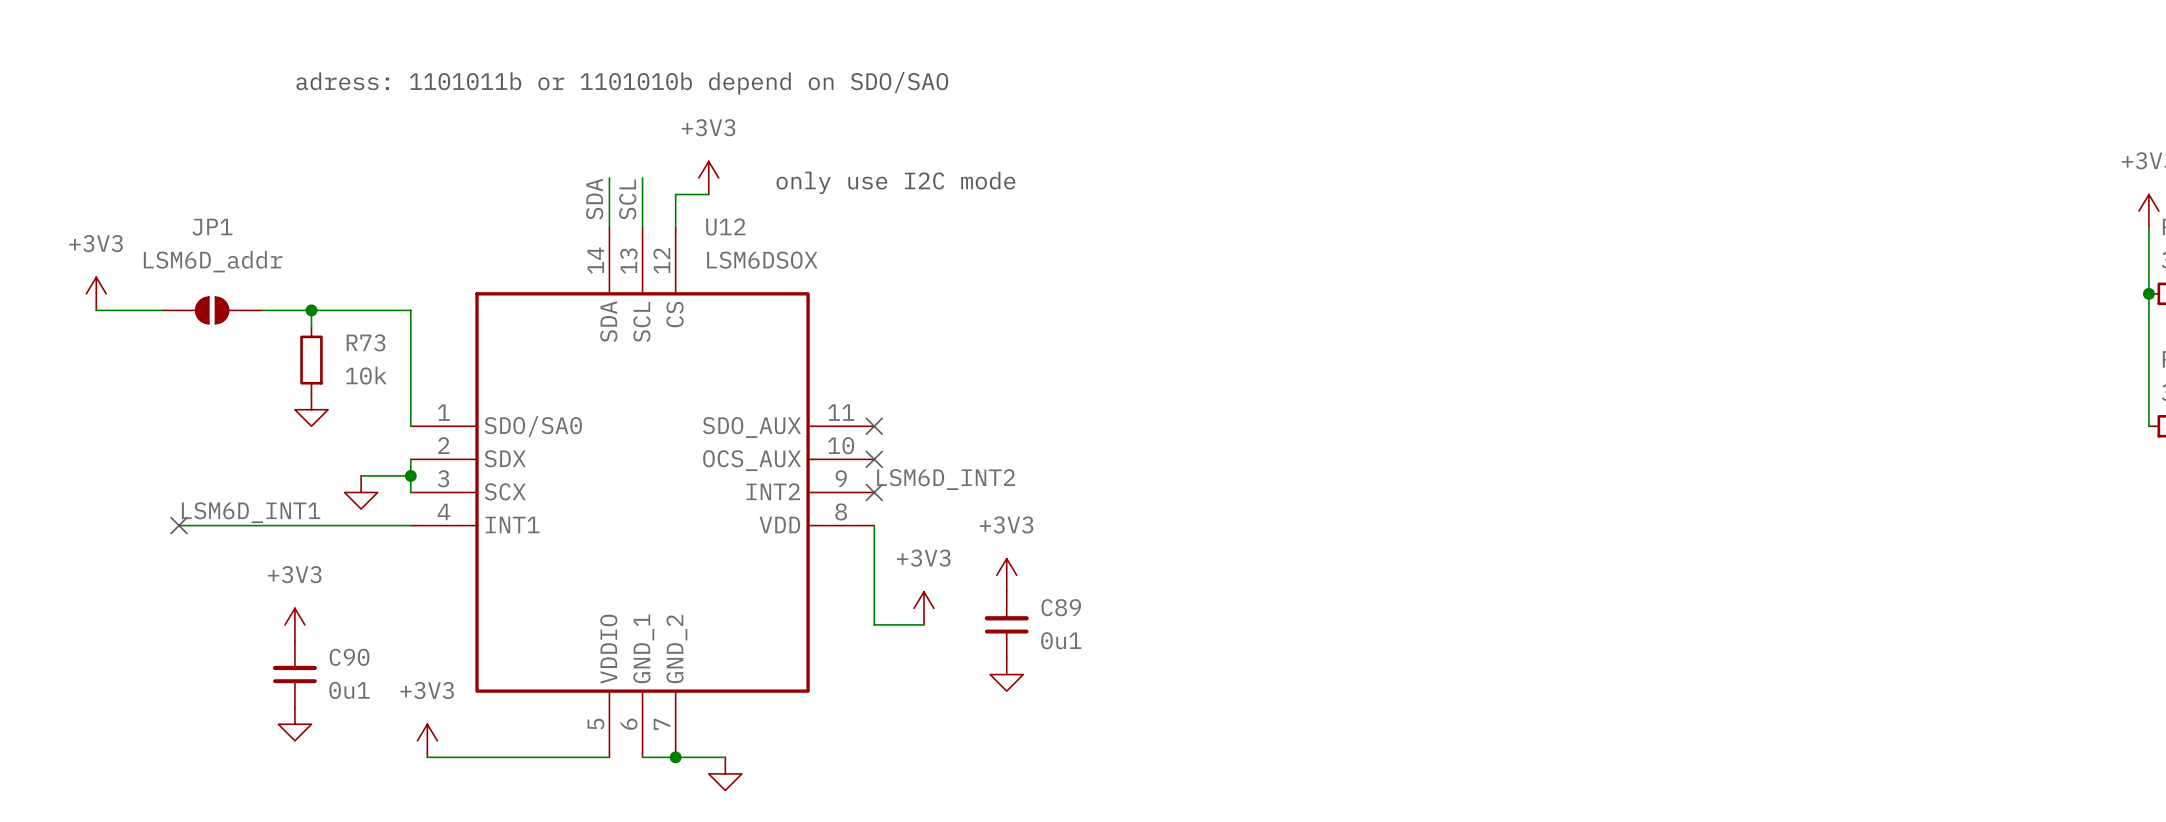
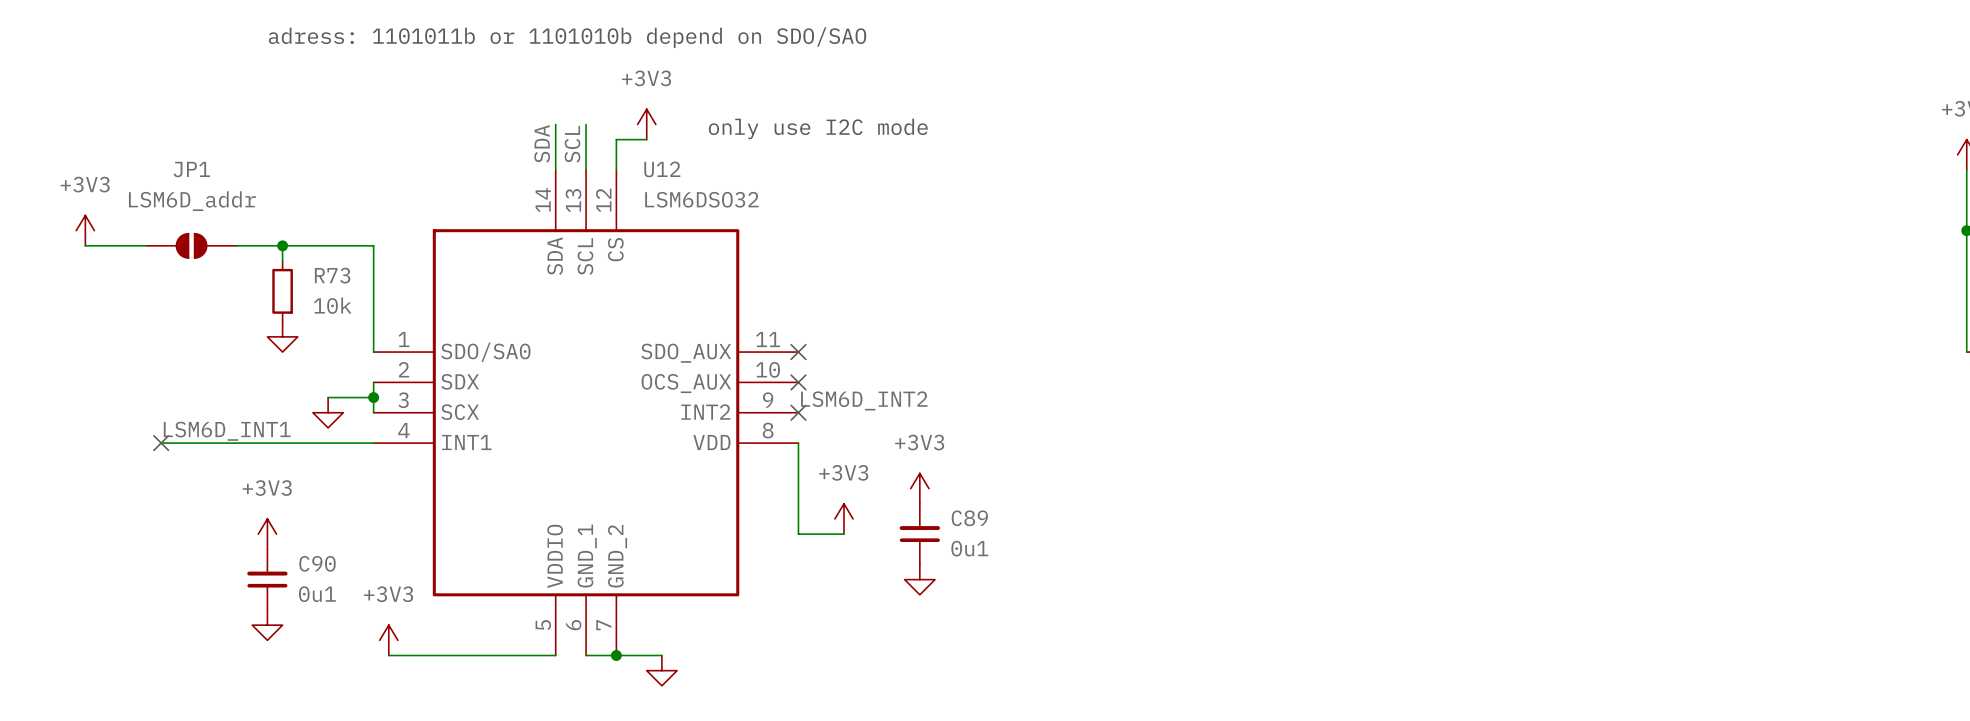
U12 value: LSM6DSOX (762, 260) -> LSM6DSO32 (701, 199)

